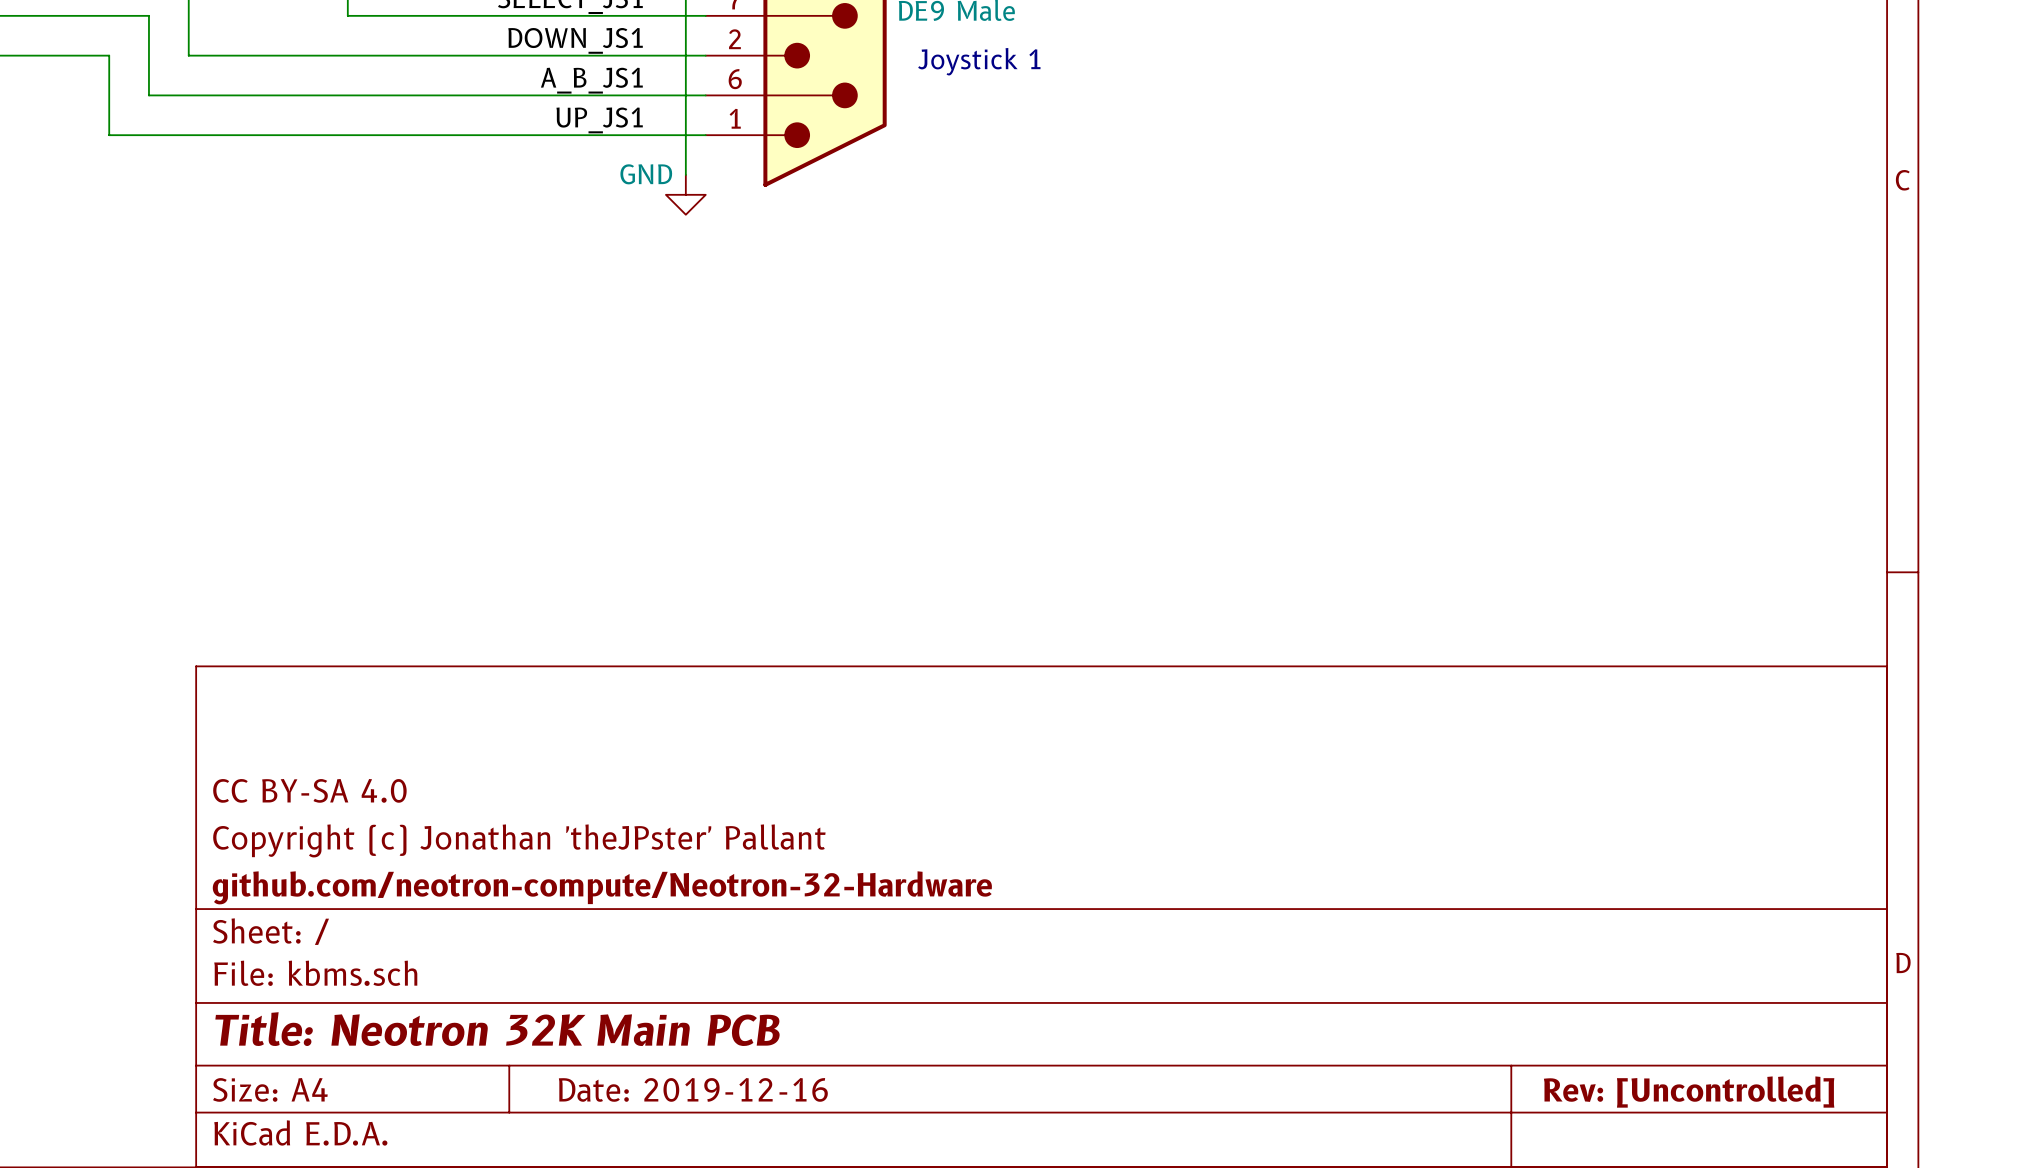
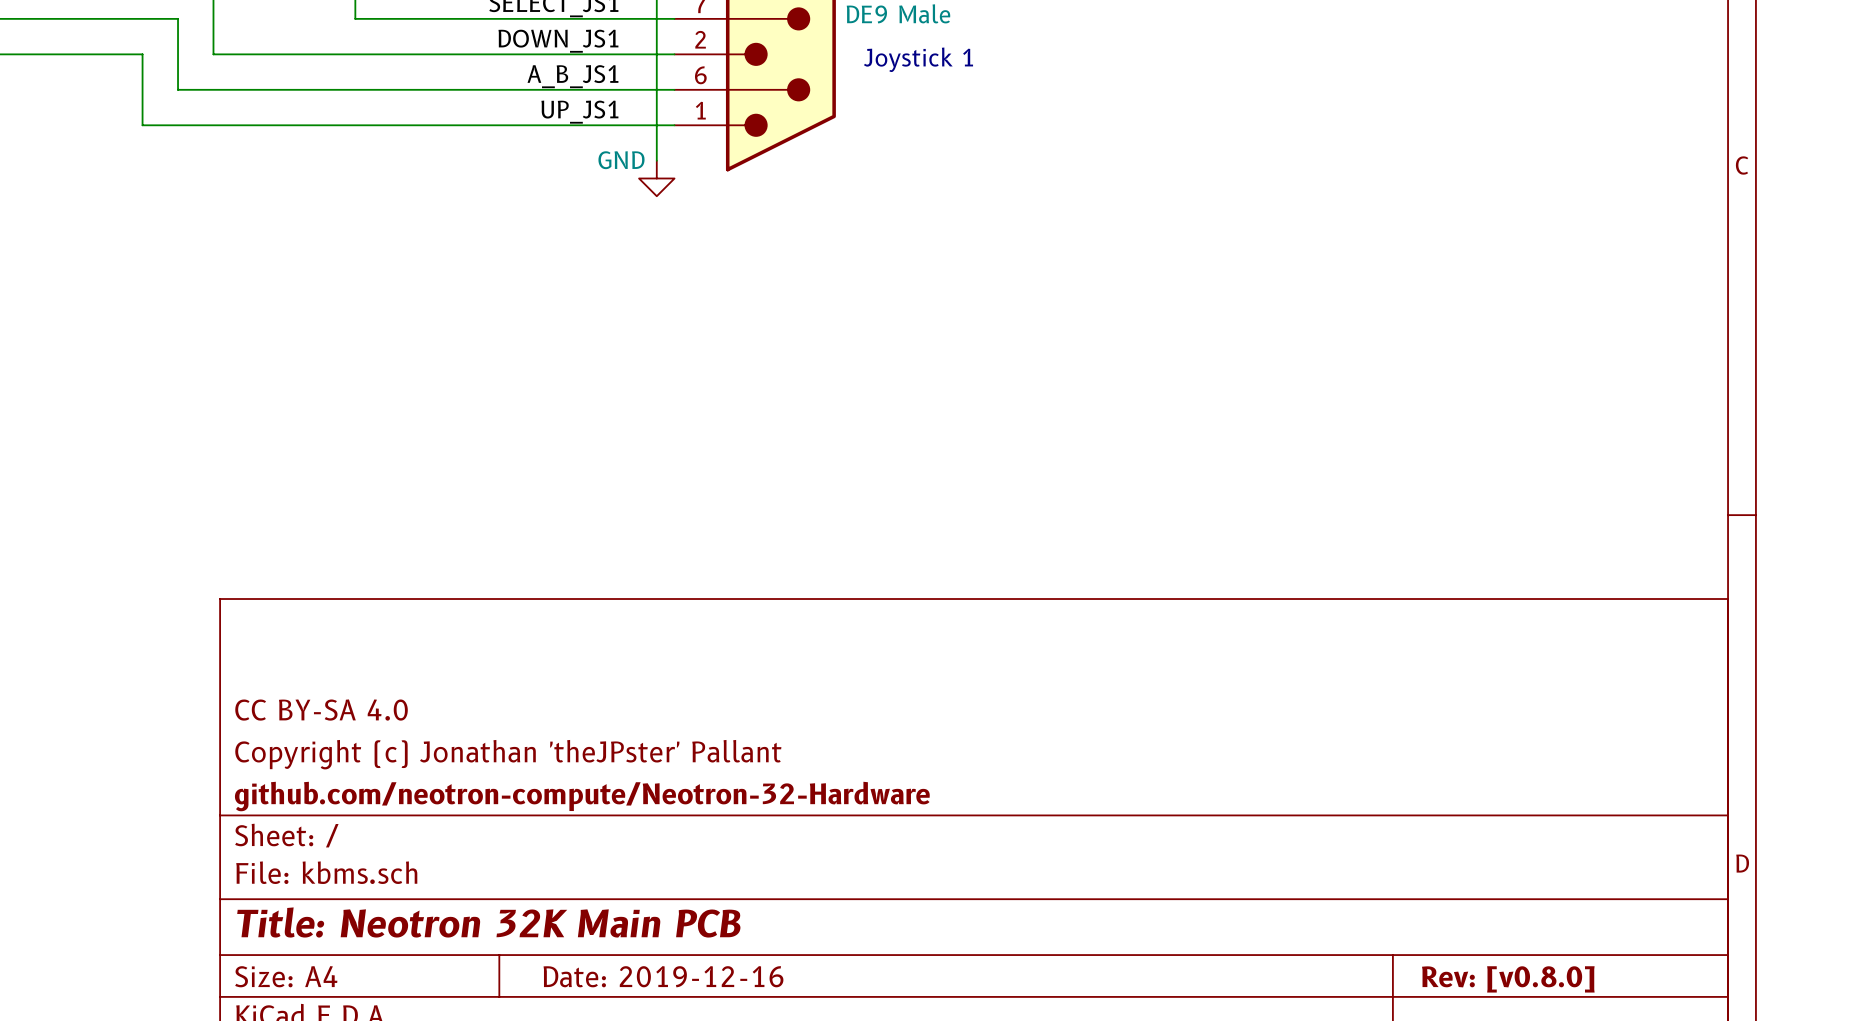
title block: Rev: [Uncontrolled] (1689, 1092) -> Rev: [v0.8.0] (1508, 979)

